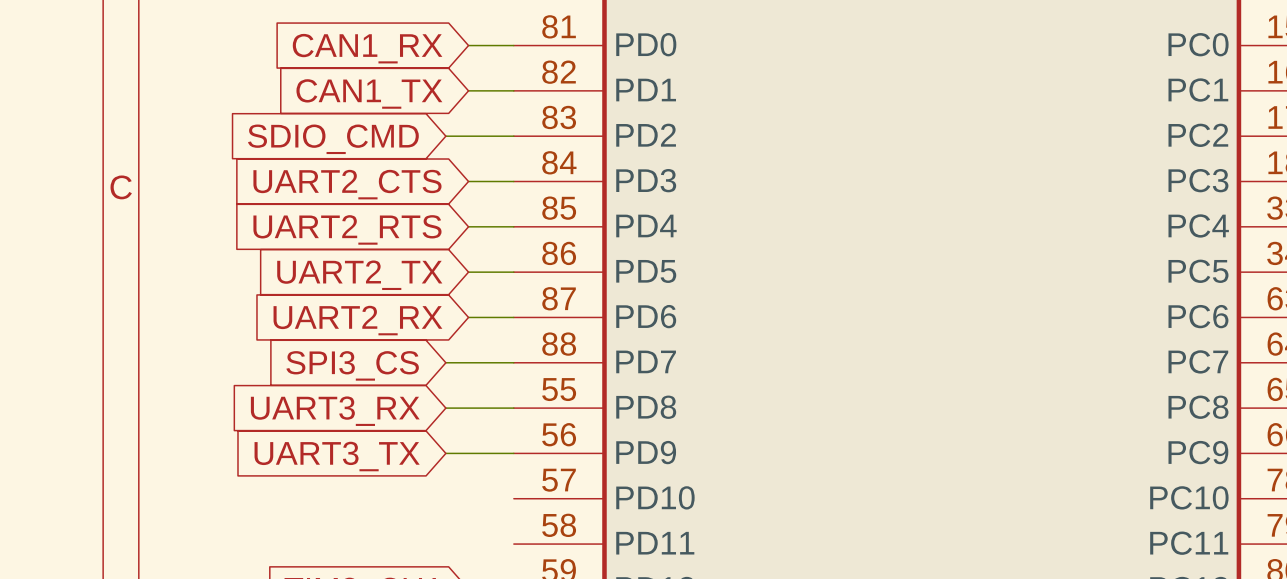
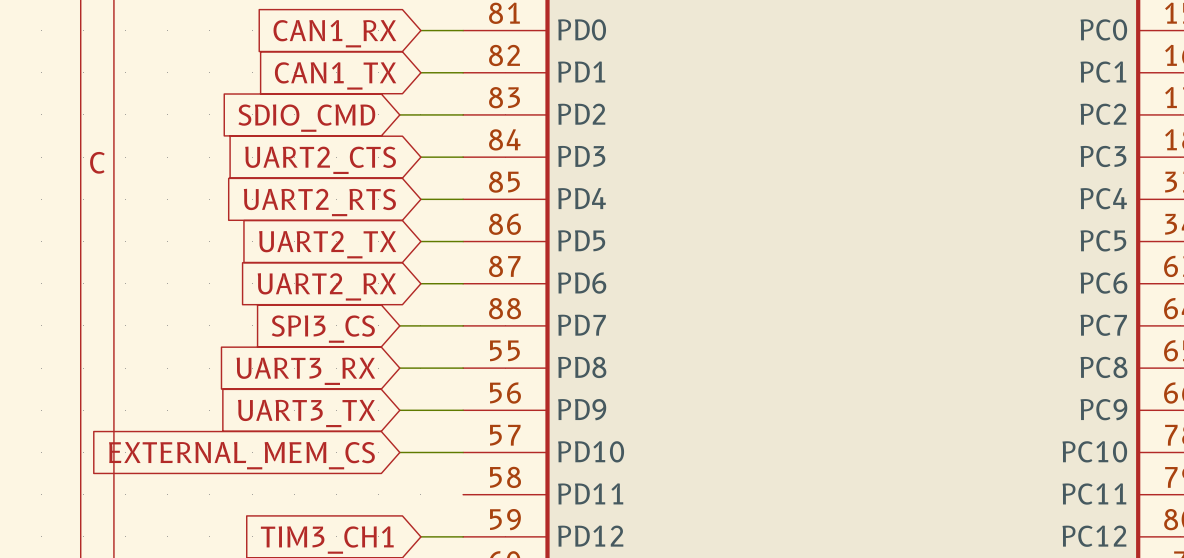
wire: none -> (399, 452) (463, 452)
global label: none -> EXTERNAL_MEM_CS (241, 455)

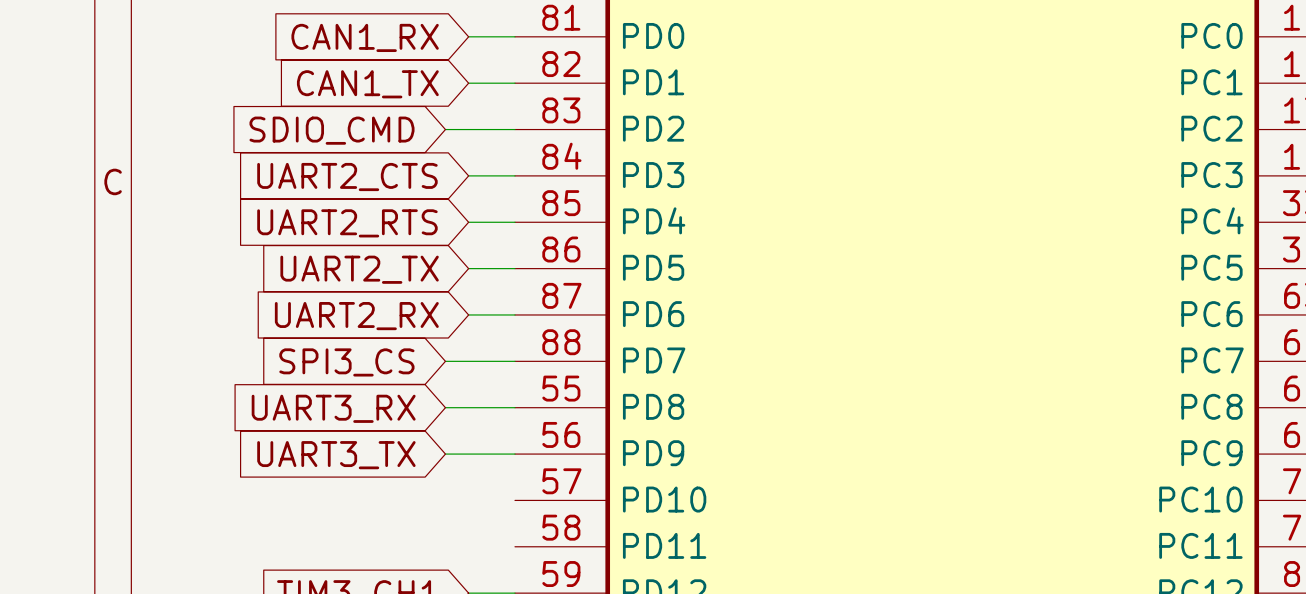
wire: (399, 452) (463, 452) -> none
global label: EXTERNAL_MEM_CS (241, 455) -> none

